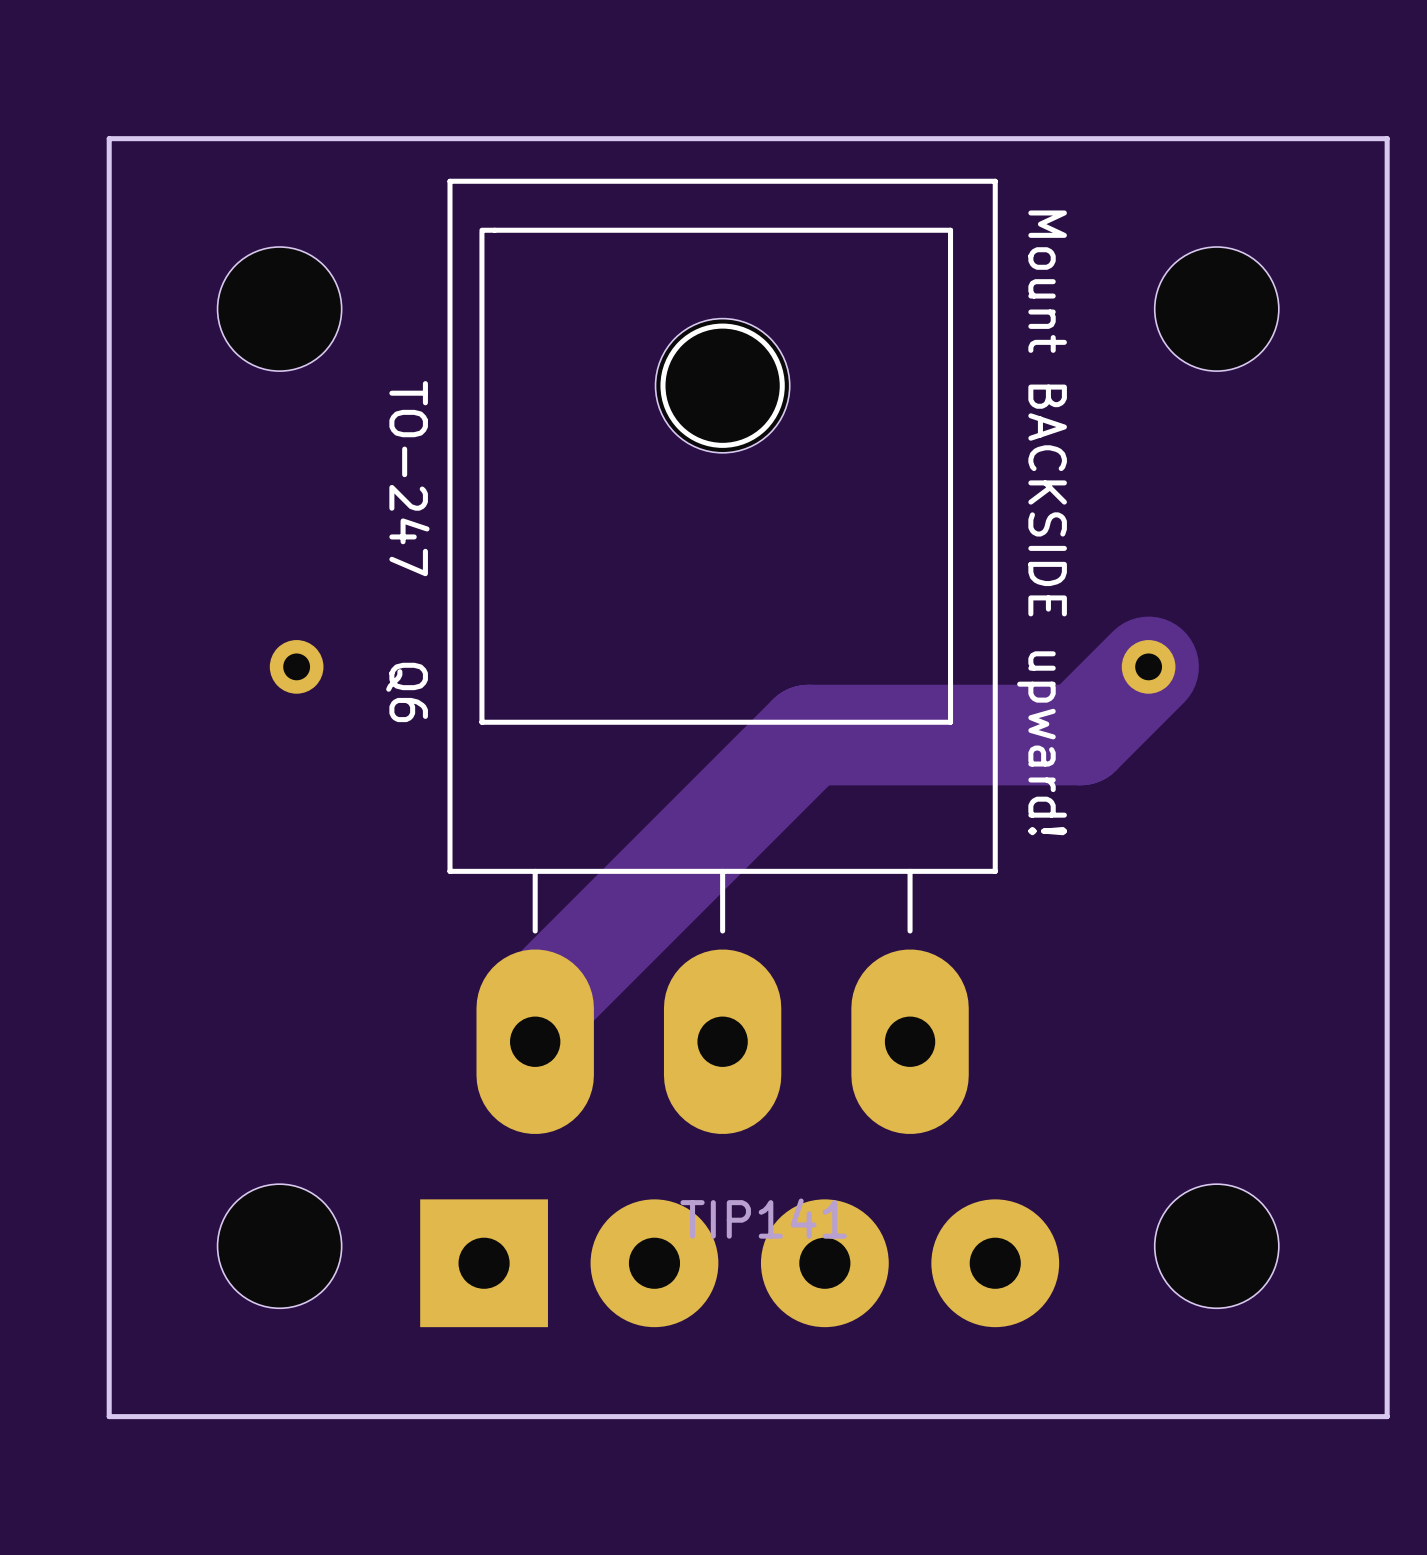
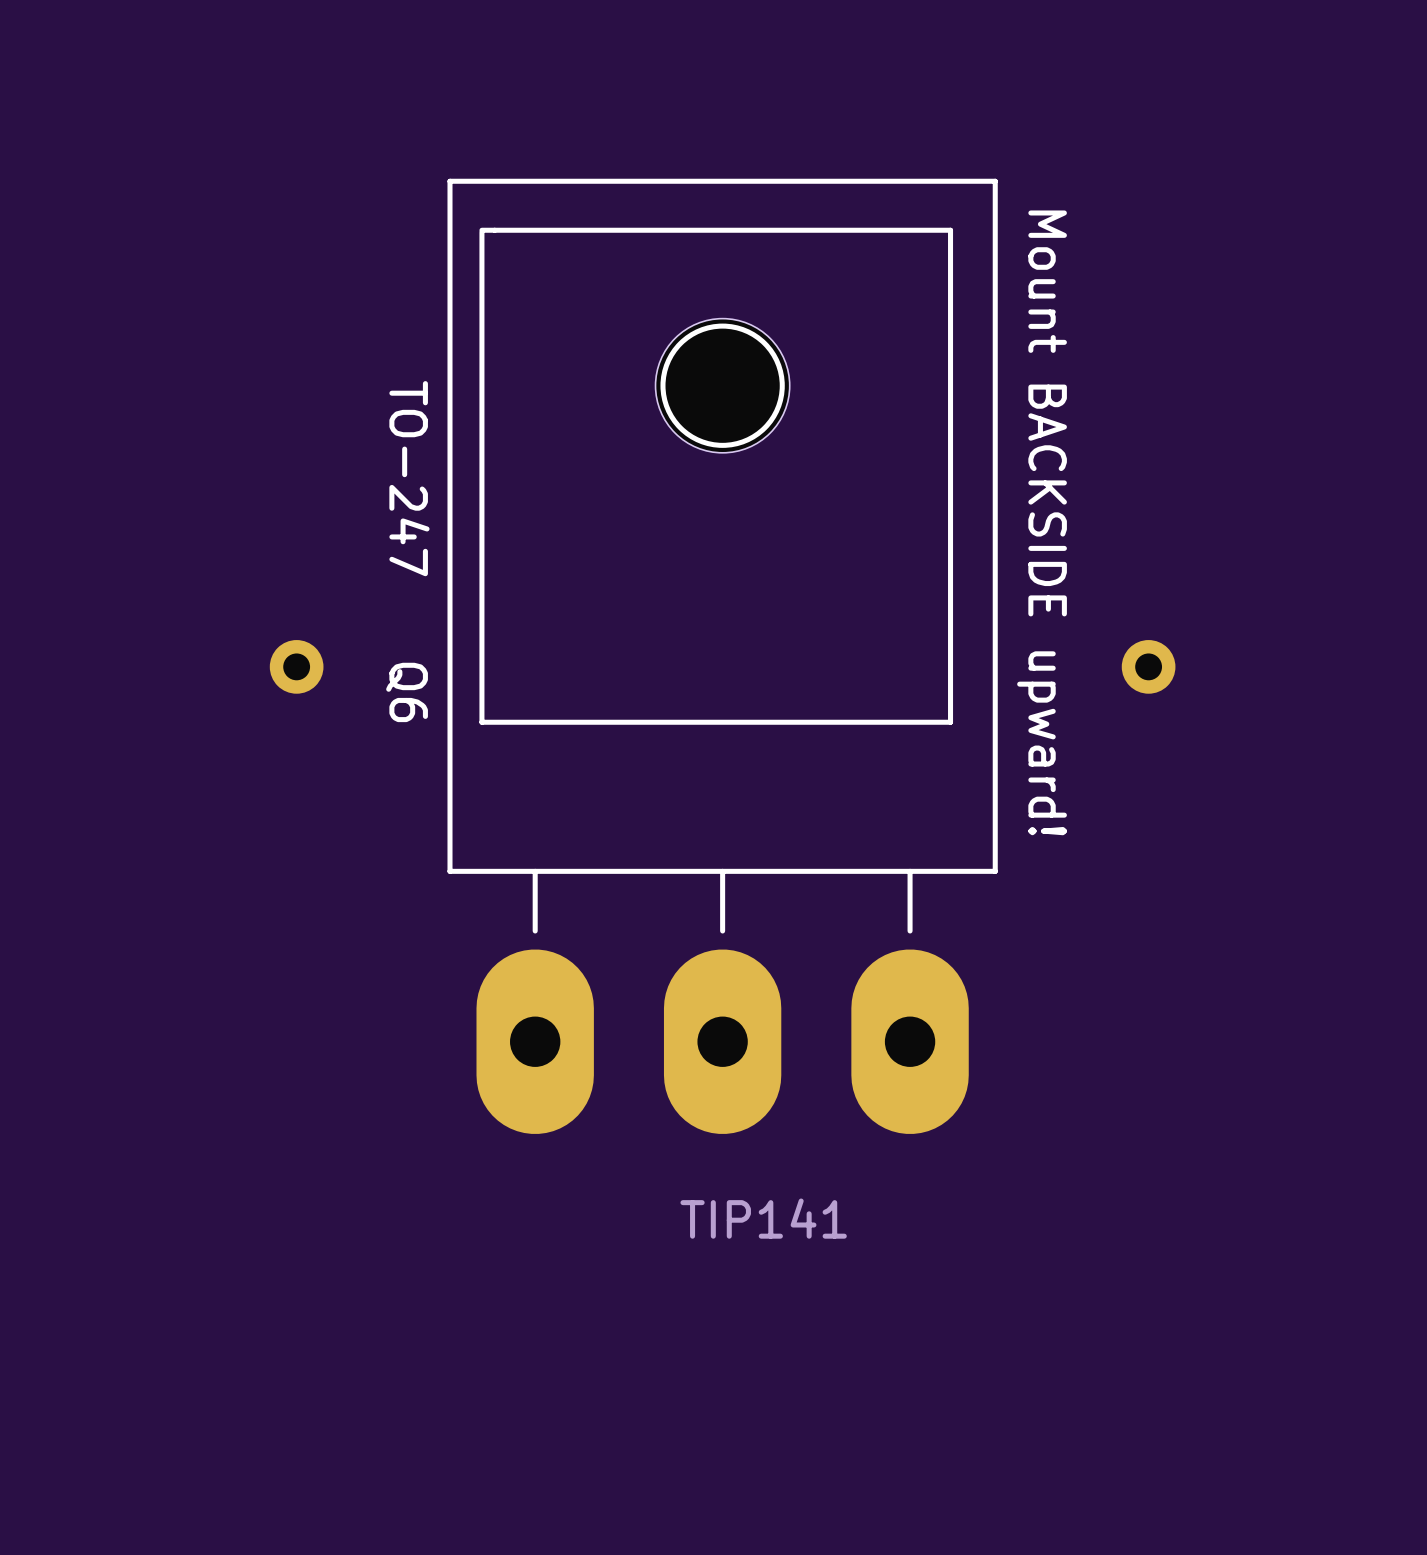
board edge: (1387, 138) (109, 138) (109, 1416) (1387, 1416) (1387, 138) -> none
part: (279, 309) -> none
part: (1216, 309) -> none
track: (1148, 666) (1080, 735) (808, 735) (535, 1008) (535, 1041) -> none
part: (279, 1246) -> none
part: (1216, 1246) -> none
part: (739, 1263) -> none

